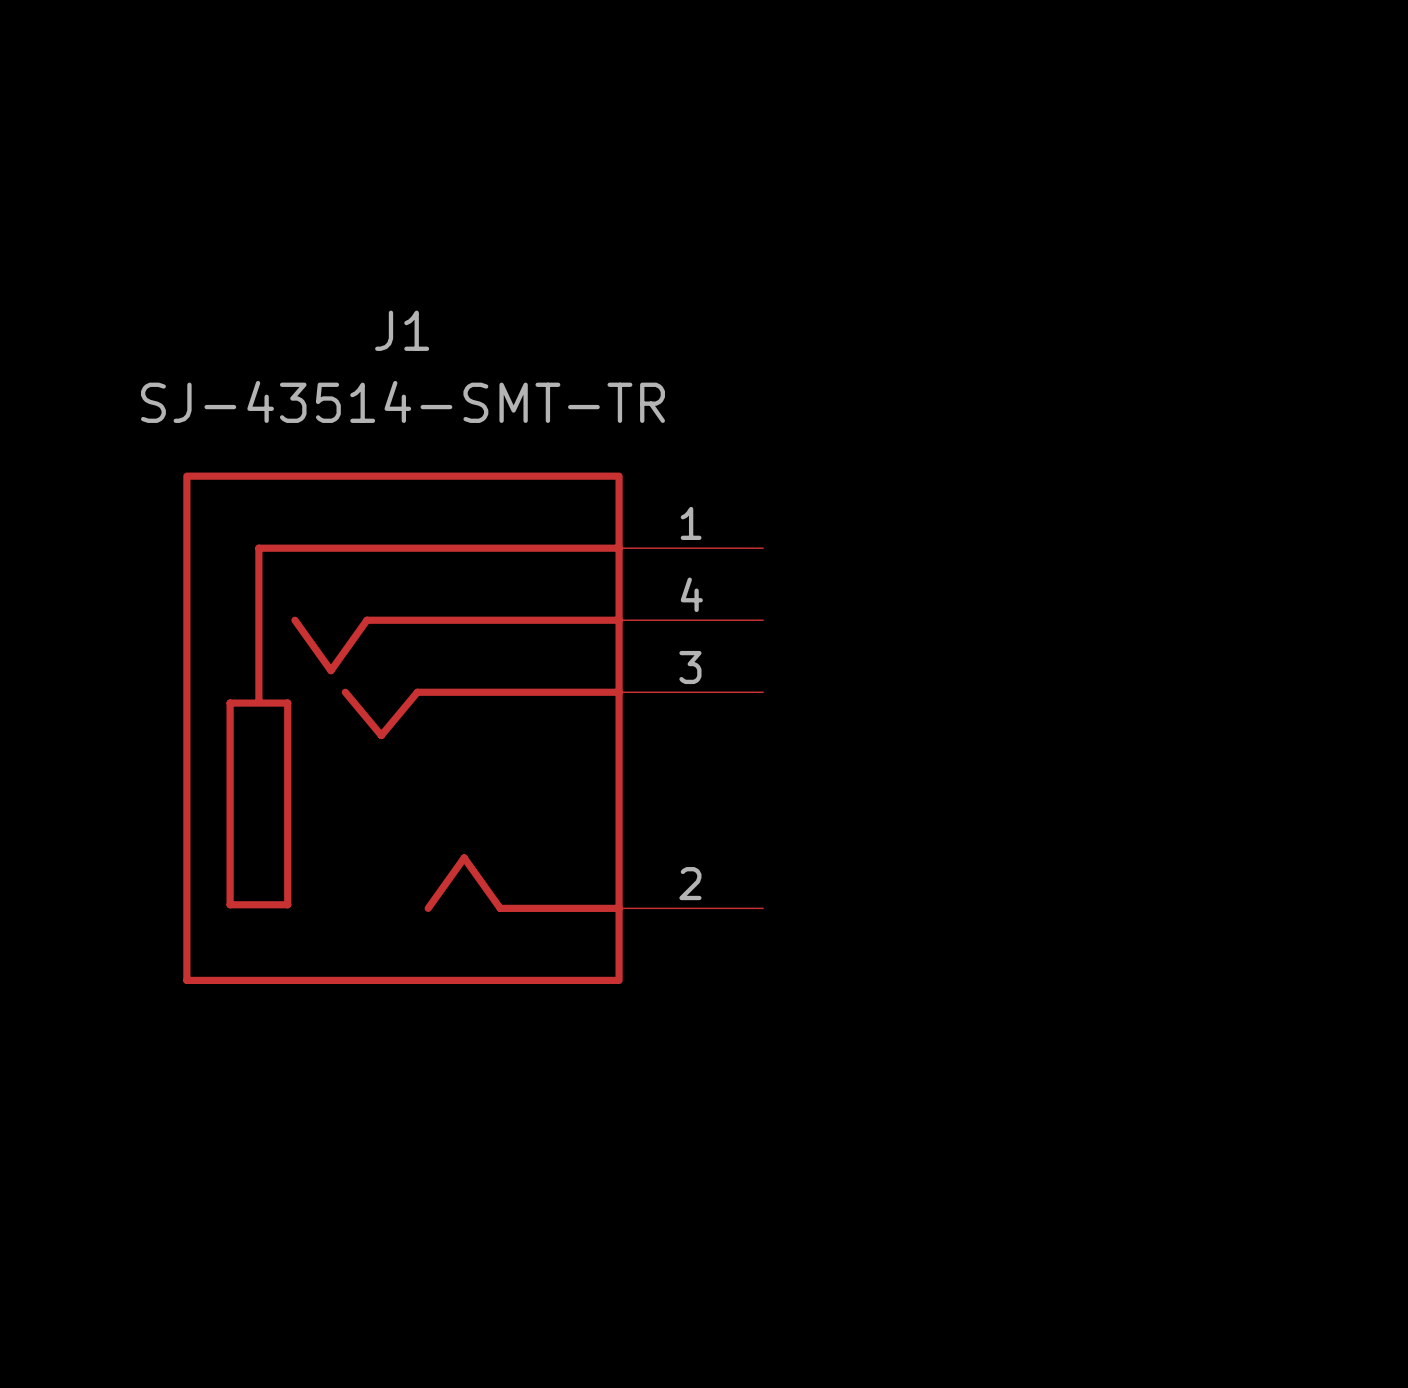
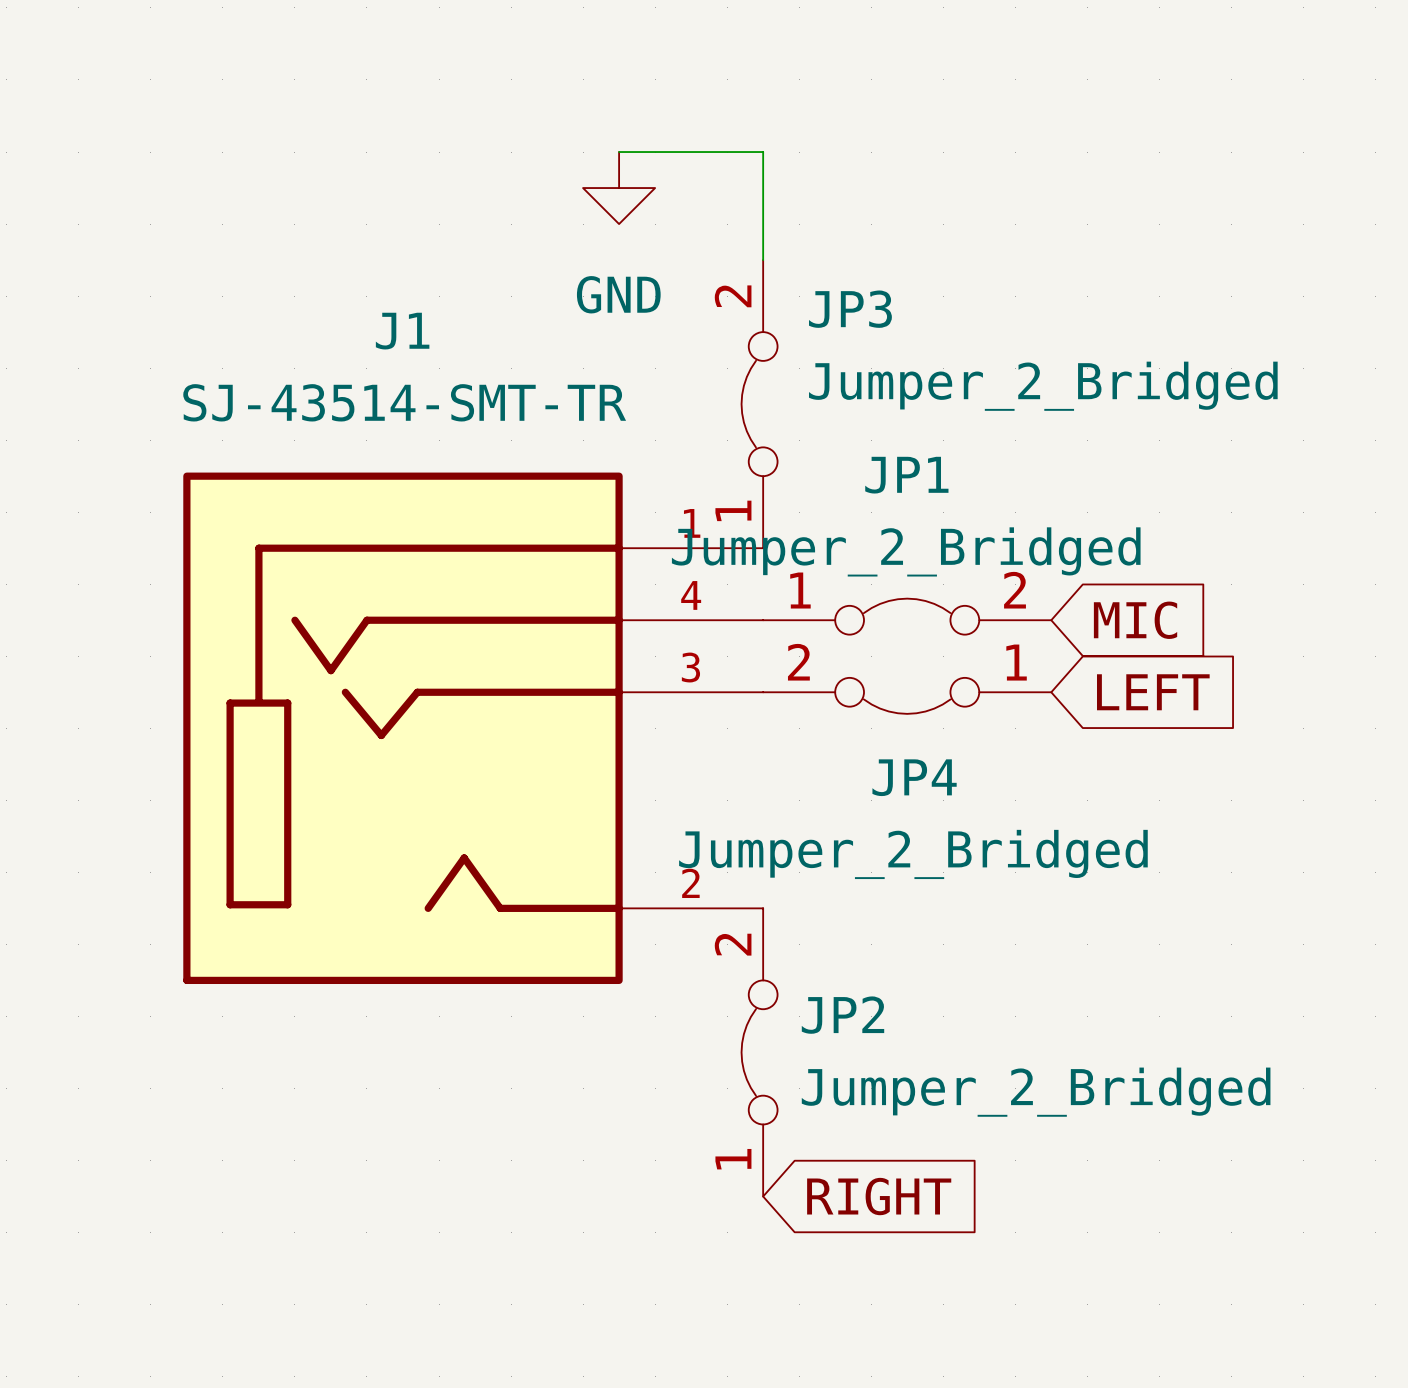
wire: none -> (619, 152) (763, 152) (763, 260)
power symbol: none -> GND (619, 188)
JP3: none -> Jumper_2_Bridged (759, 404)
JP1: none -> Jumper_2_Bridged (907, 616)
global label: none -> MIC (1135, 620)
global label: none -> LEFT (1153, 692)
JP4: none -> Jumper_2_Bridged (907, 695)
JP2: none -> Jumper_2_Bridged (759, 1052)
global label: none -> RIGHT (879, 1196)

